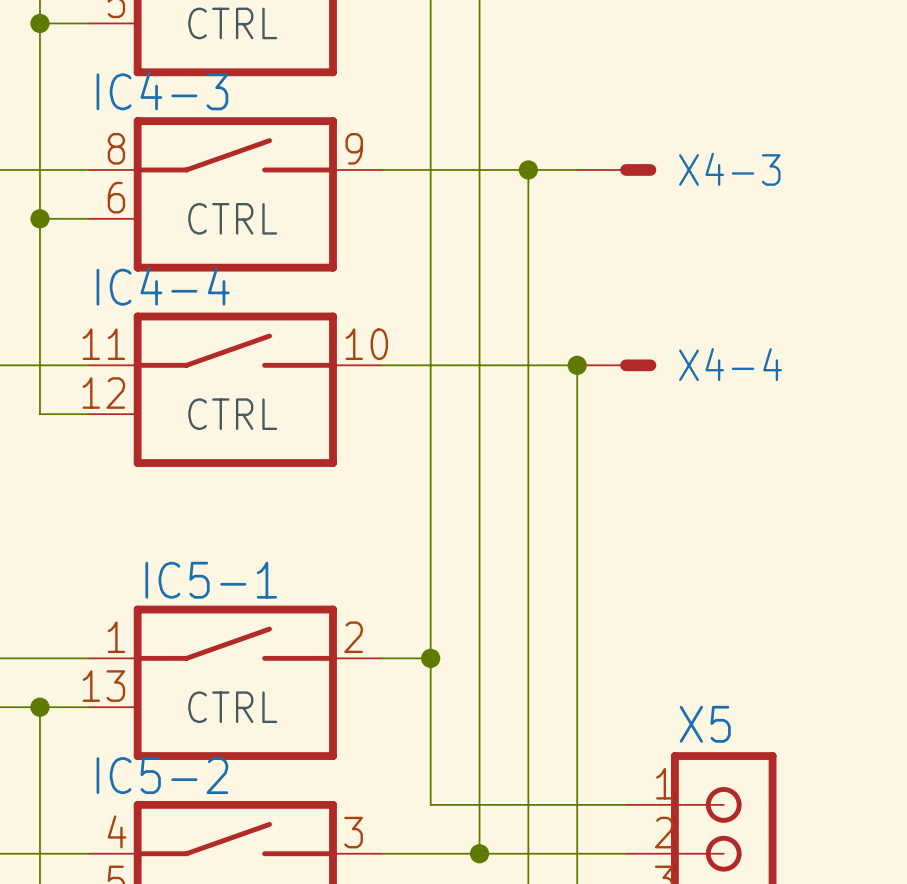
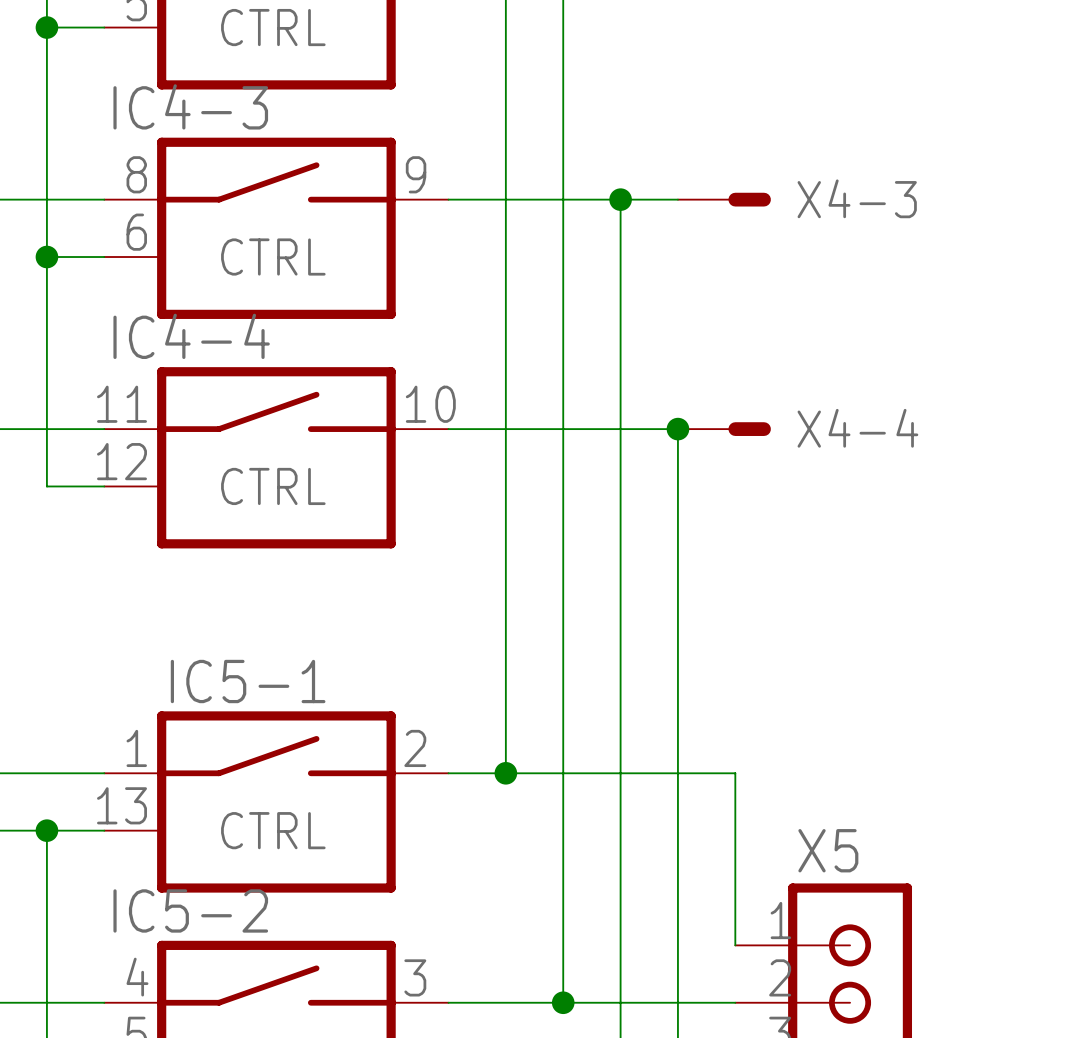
wire: (430, 658) (430, 804) (626, 804) -> (505, 773) (735, 773) (735, 945)

